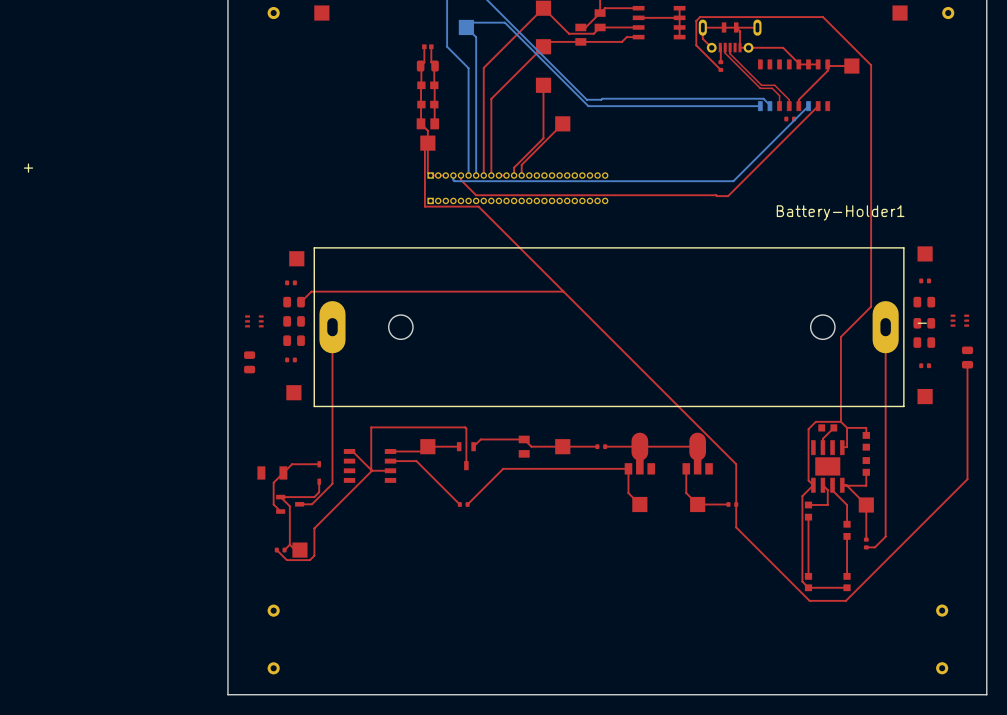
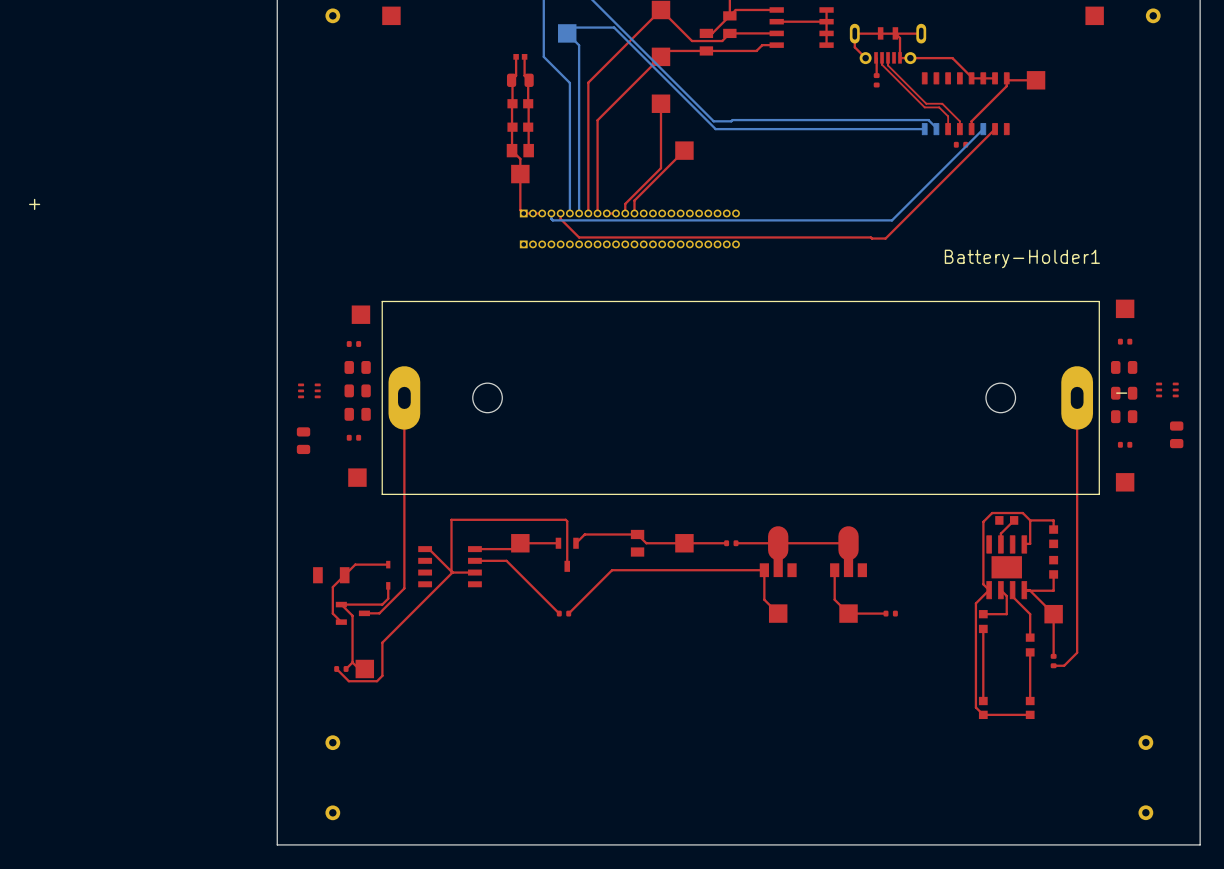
top track: (720, 69) (696, 45) (696, 20) (700, 17) (823, 17) (871, 65) (871, 306) (840, 336) (840, 421) -> none
top track: (427, 143) (424, 146) (424, 206) (478, 206) (736, 464) (736, 527) (809, 600) (845, 600) (967, 479) (967, 364) -> none
top track: (563, 291) (311, 291) (300, 302) -> none

